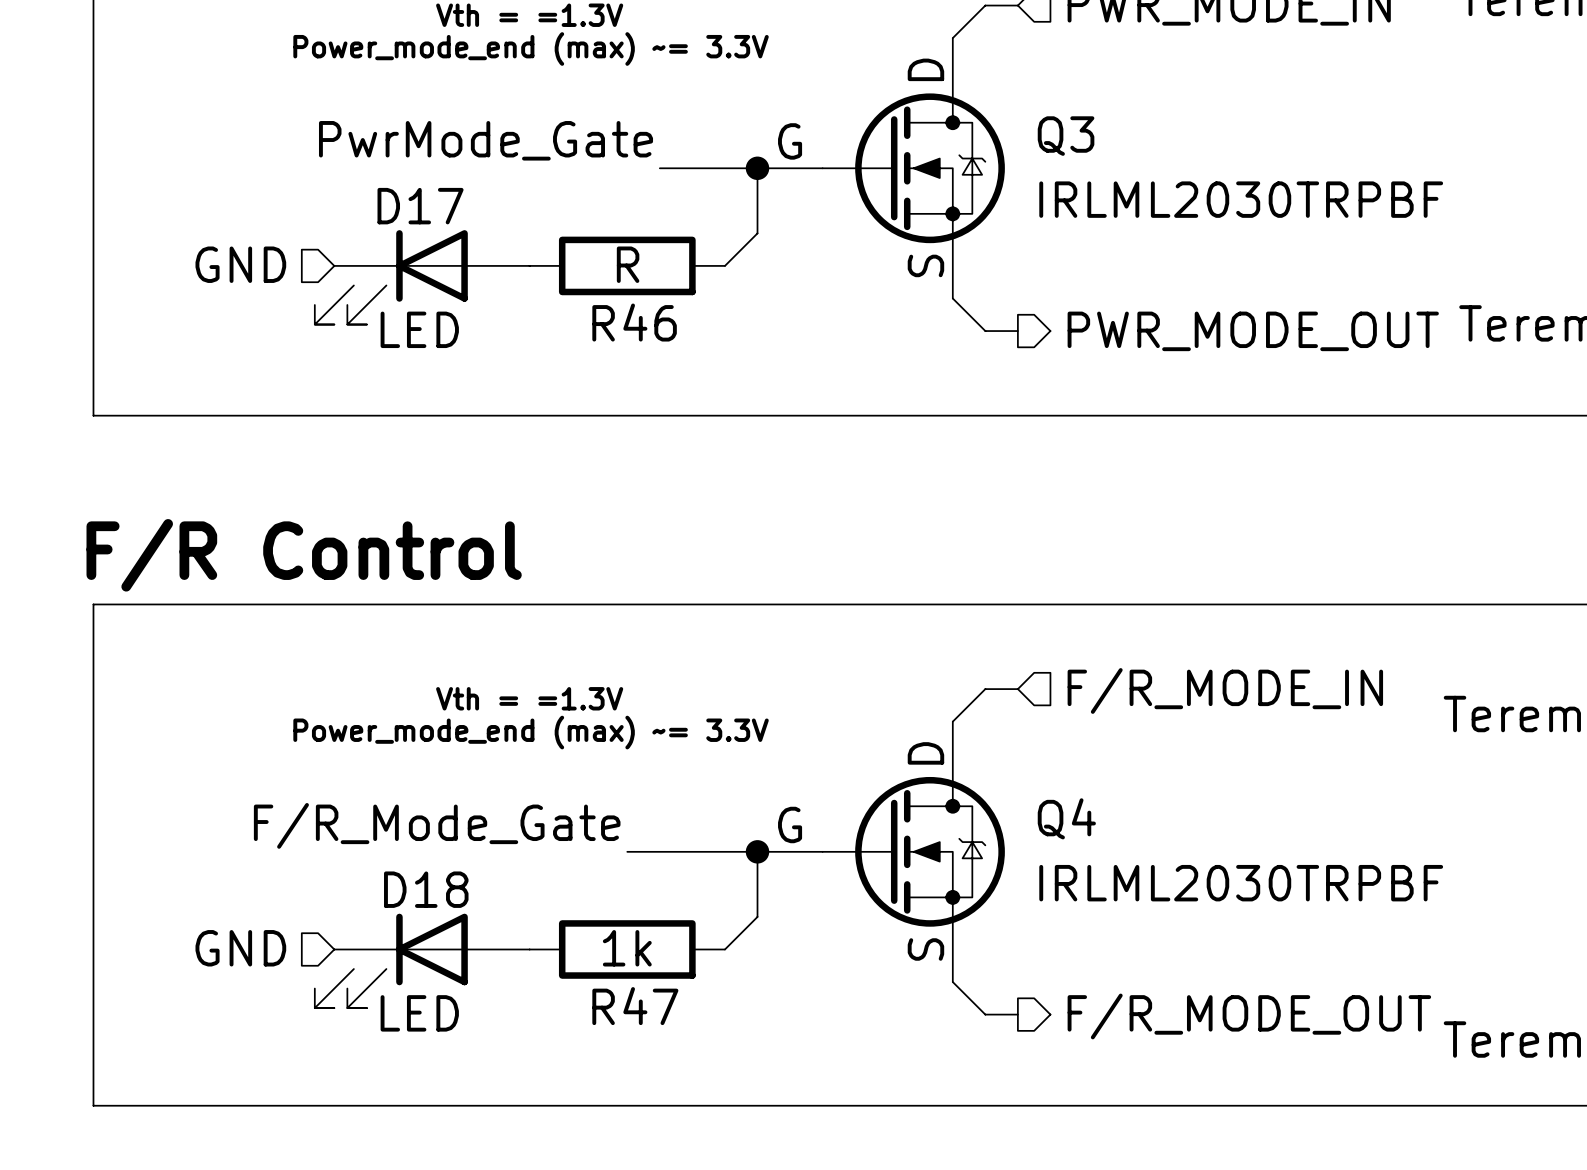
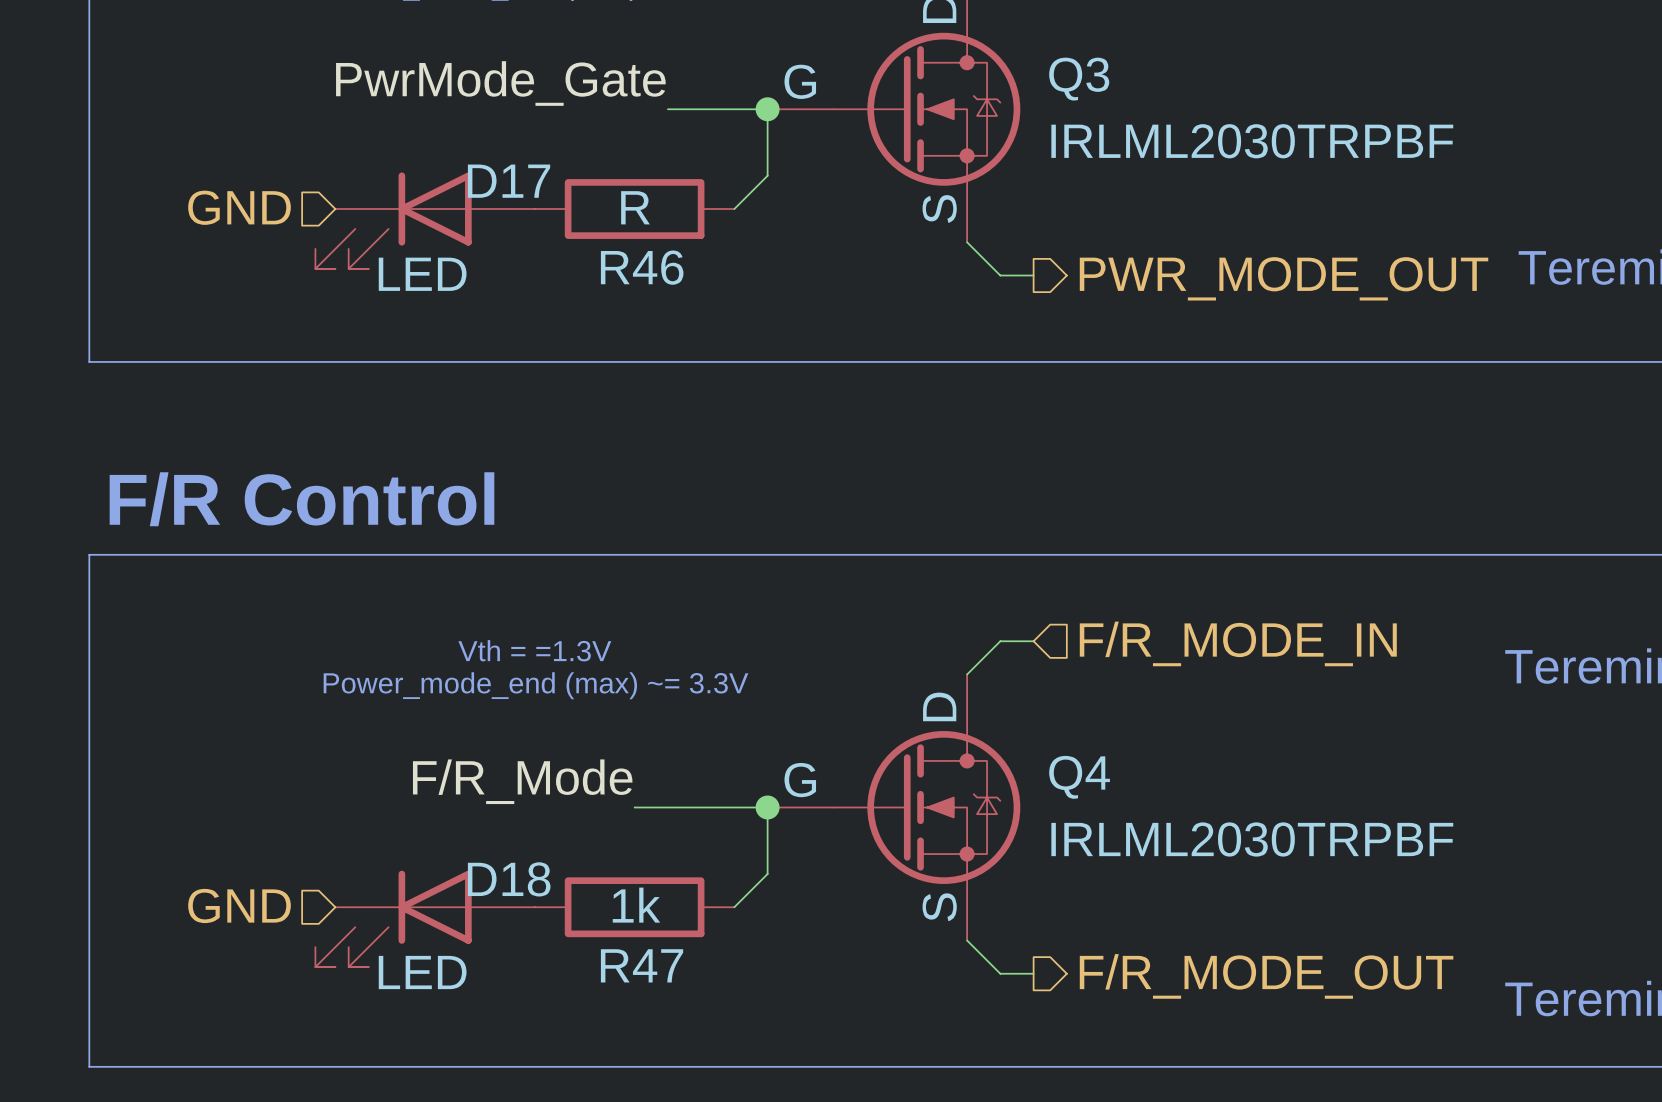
D17 name position: D17 (420, 206) -> D17 (509, 181)
label: F/R_Mode_Gate (437, 825) -> F/R_Mode (522, 781)
D18 name position: D18 (426, 889) -> D18 (509, 879)

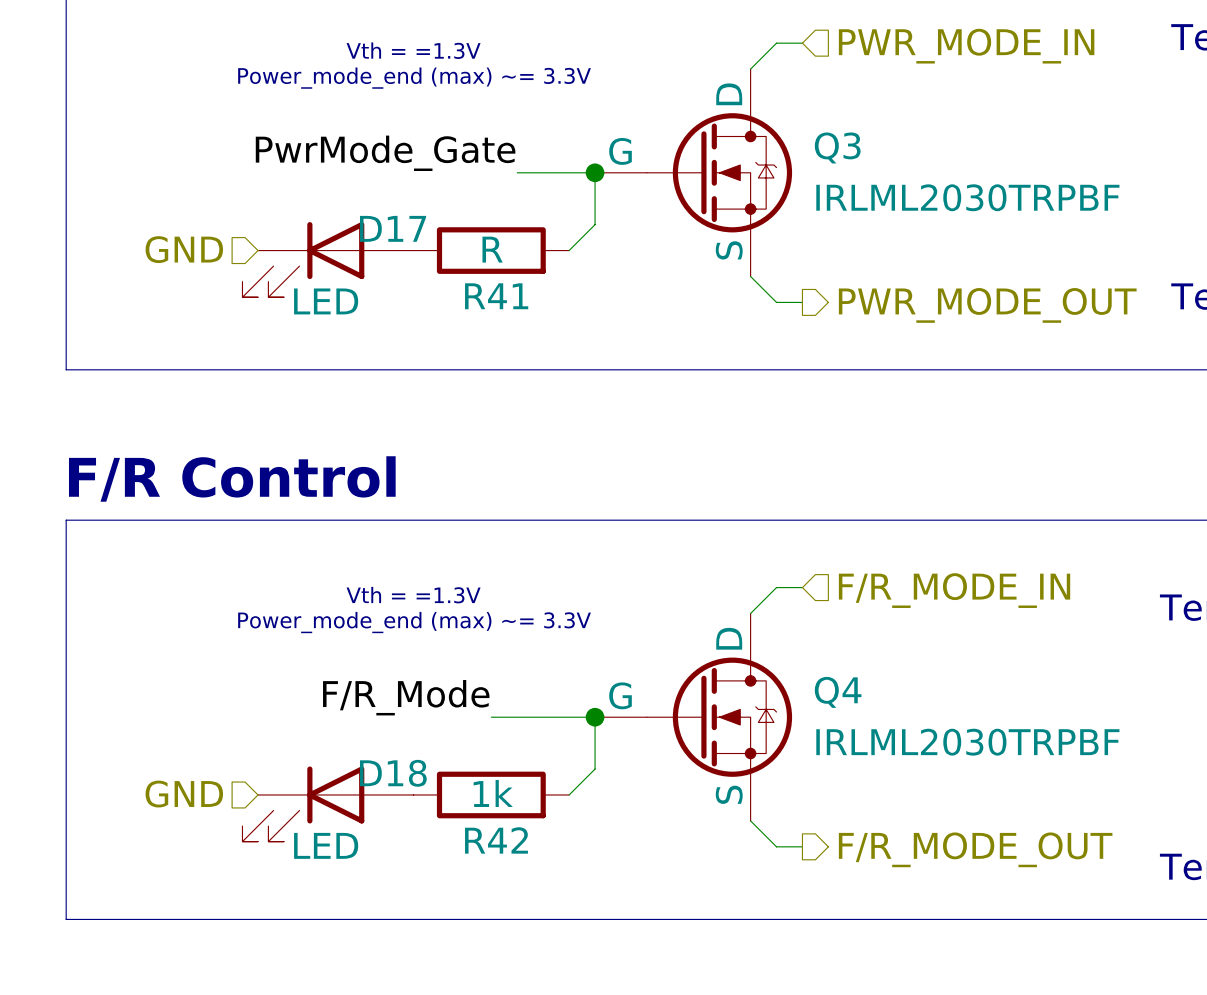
R46 name: R46 (642, 267) -> R41 (496, 296)
R47 name: R47 (642, 965) -> R42 (496, 840)

